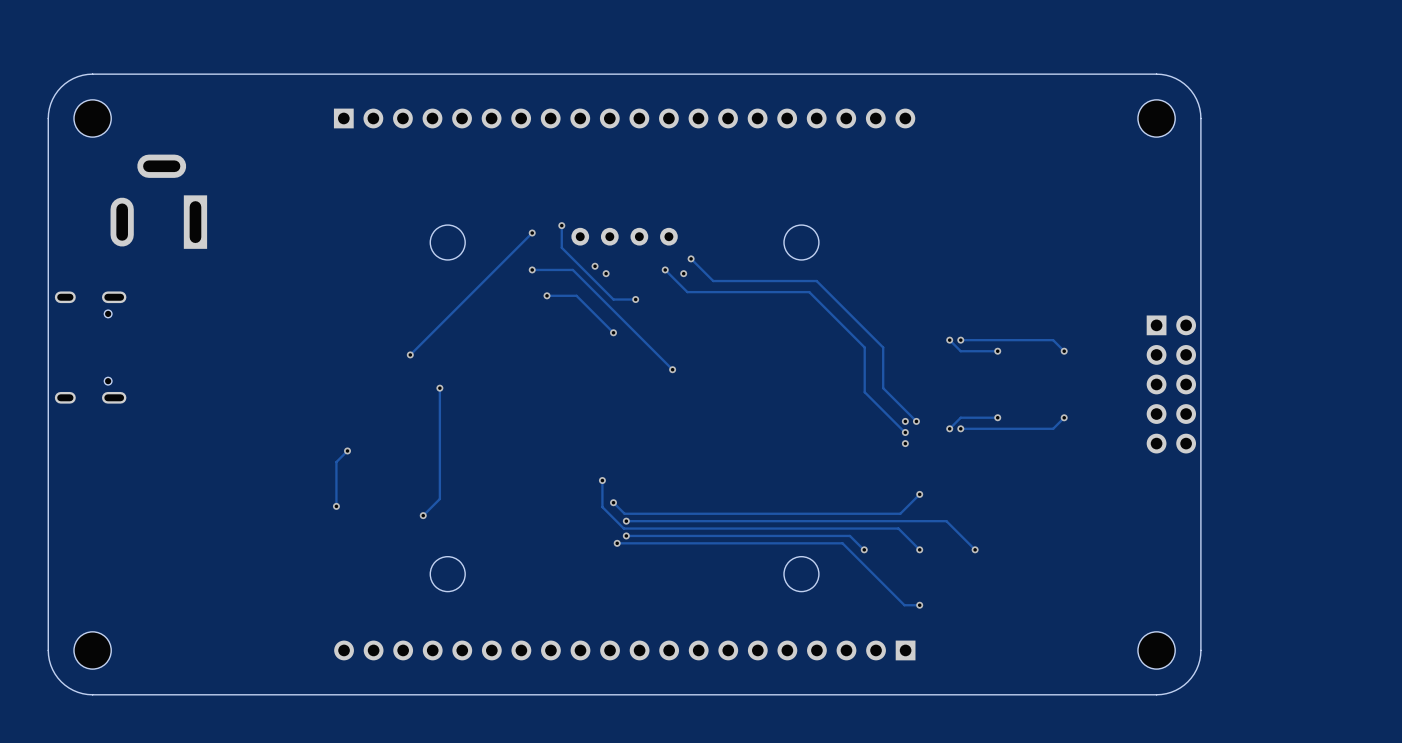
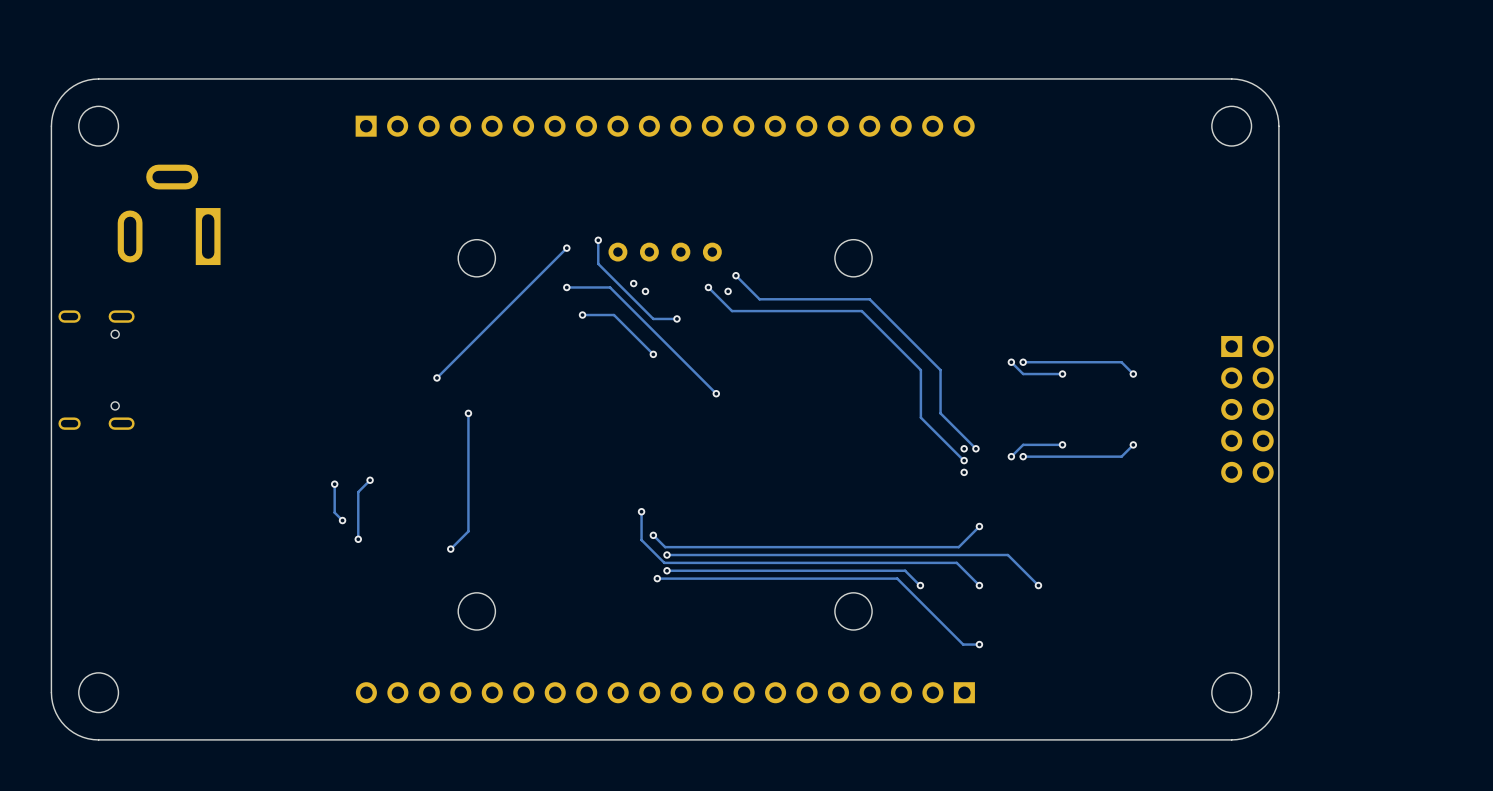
track: none -> (334, 484) (334, 512) (342, 520)
via: none -> (334, 484)
via: none -> (342, 520)

